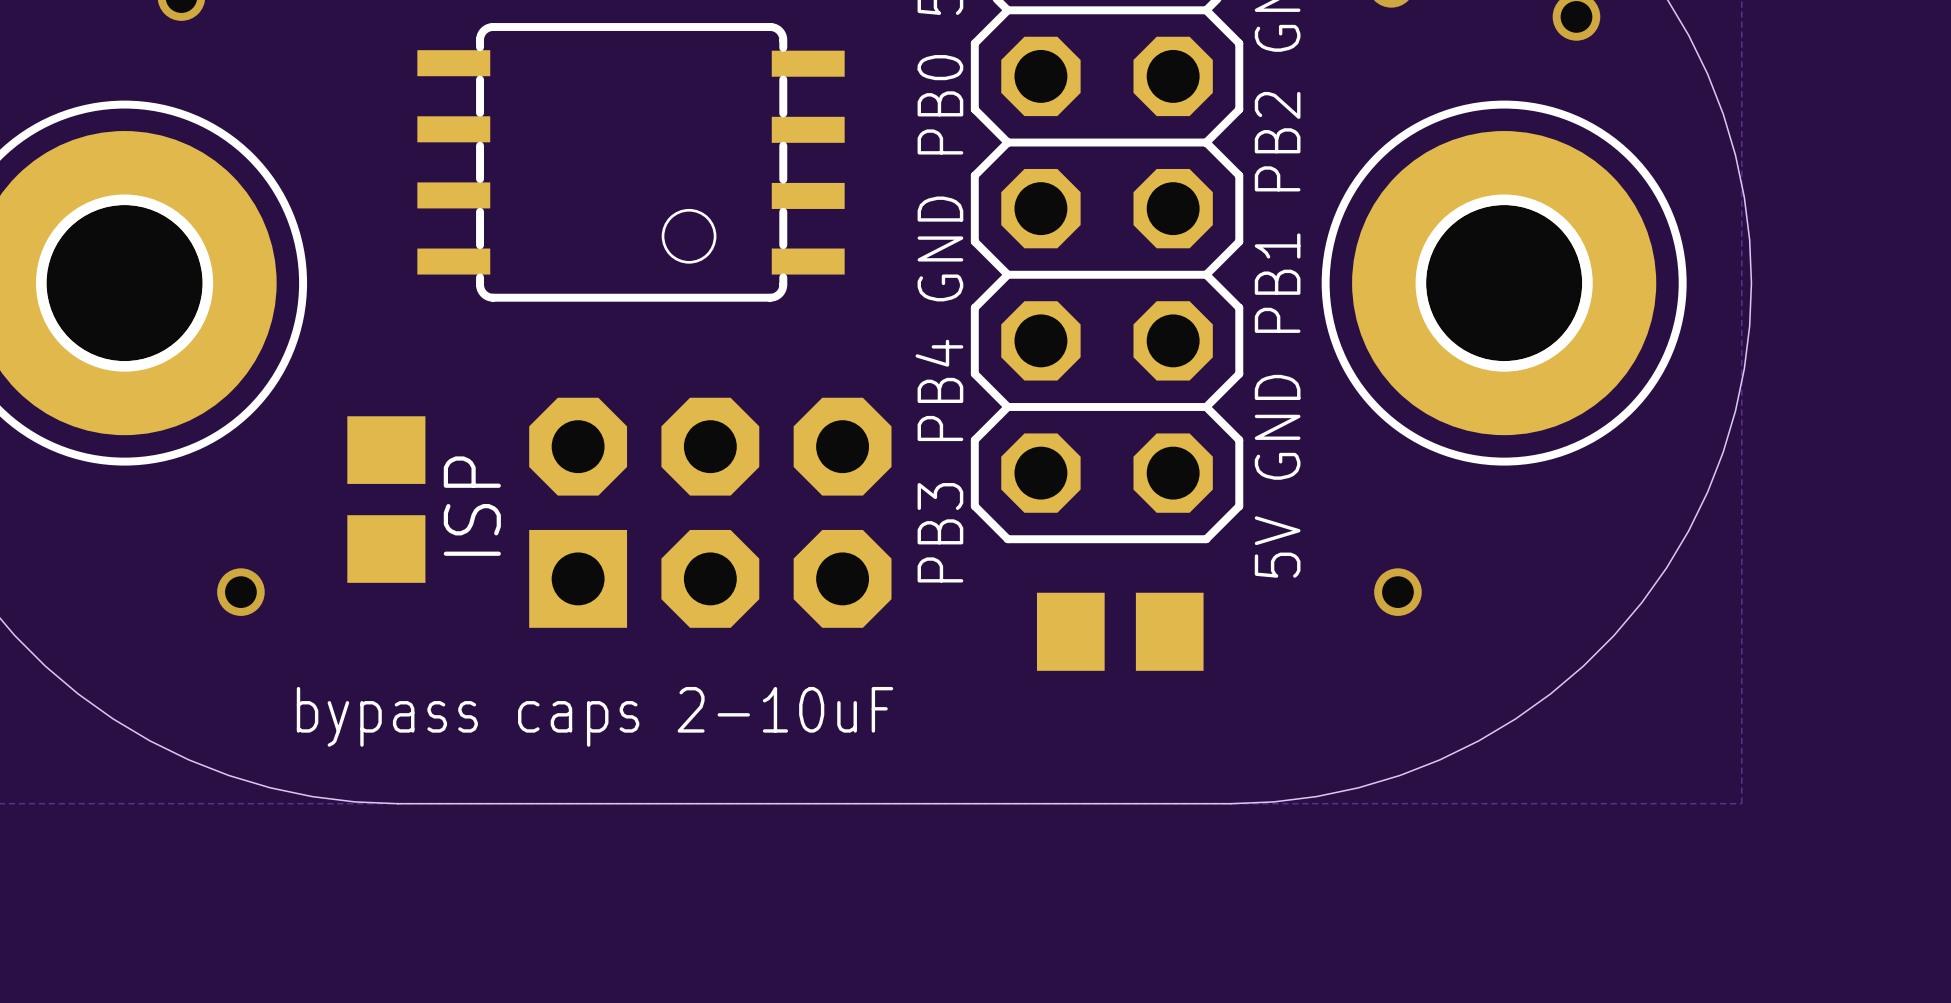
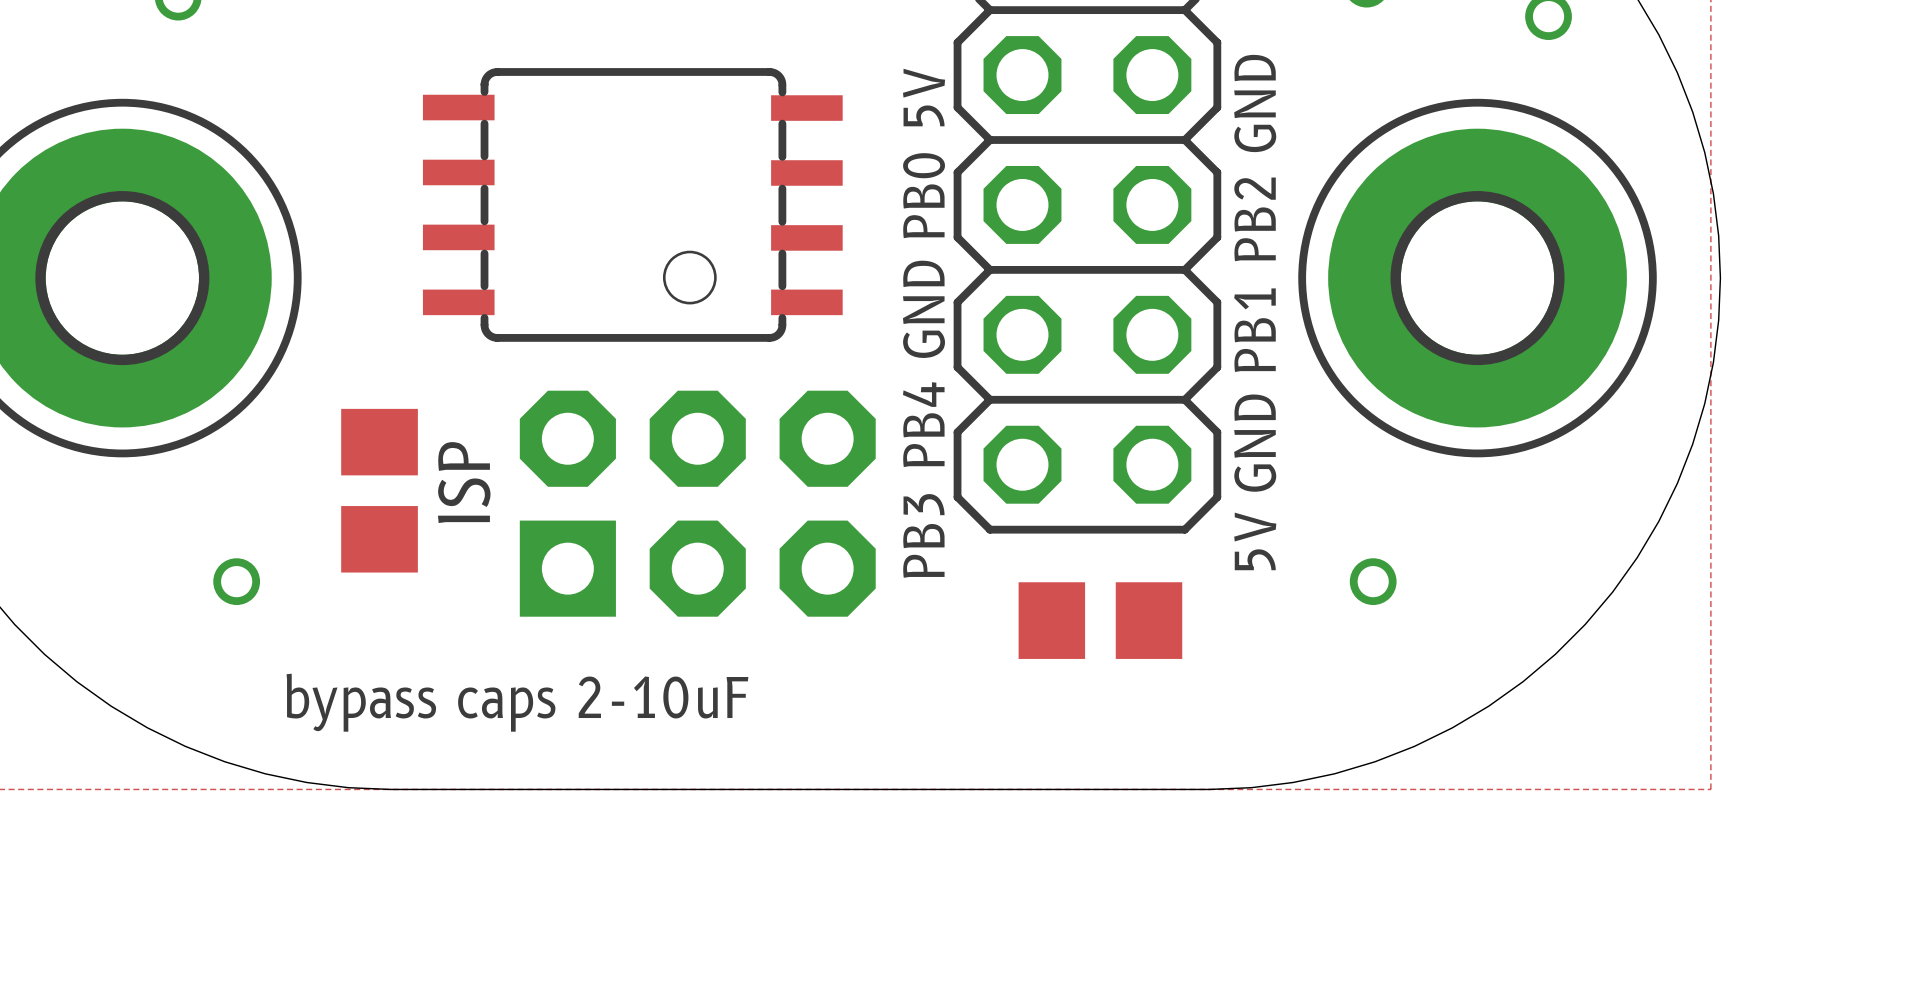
part position: (631, 162) -> (632, 204)

